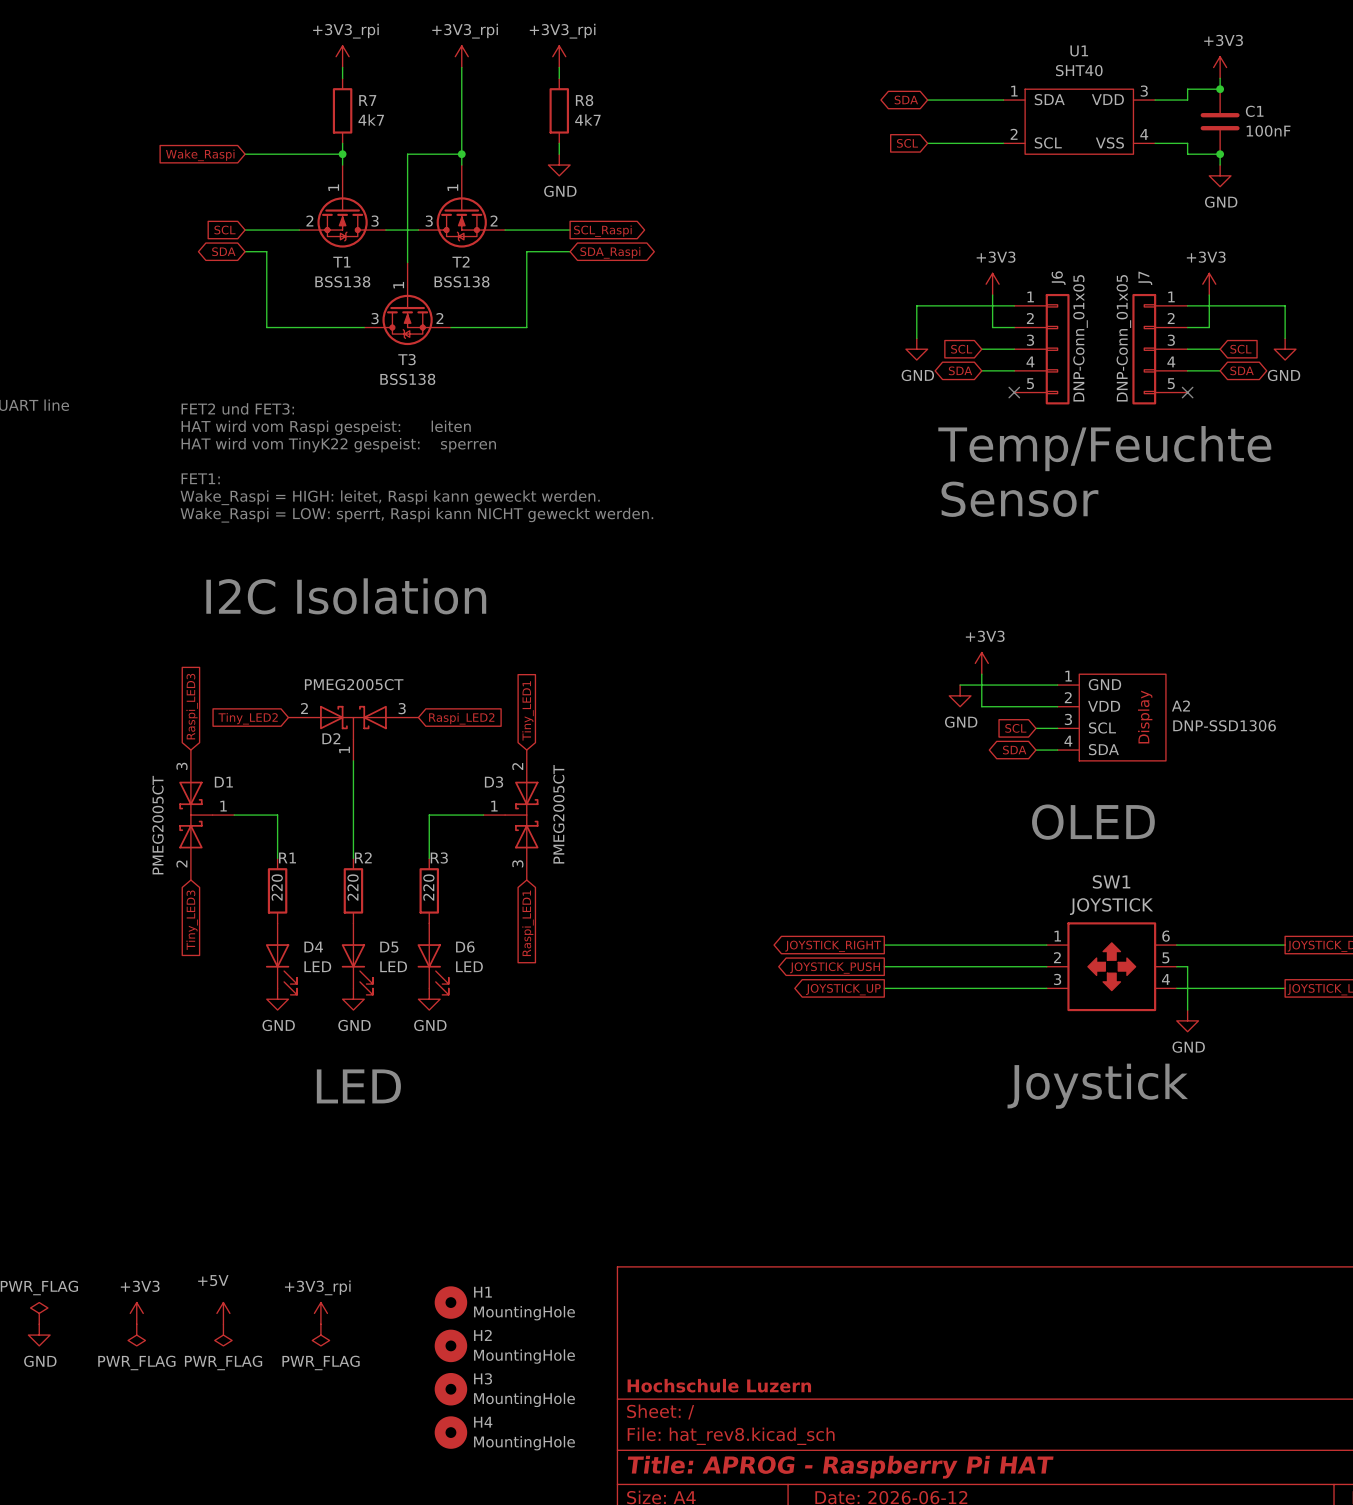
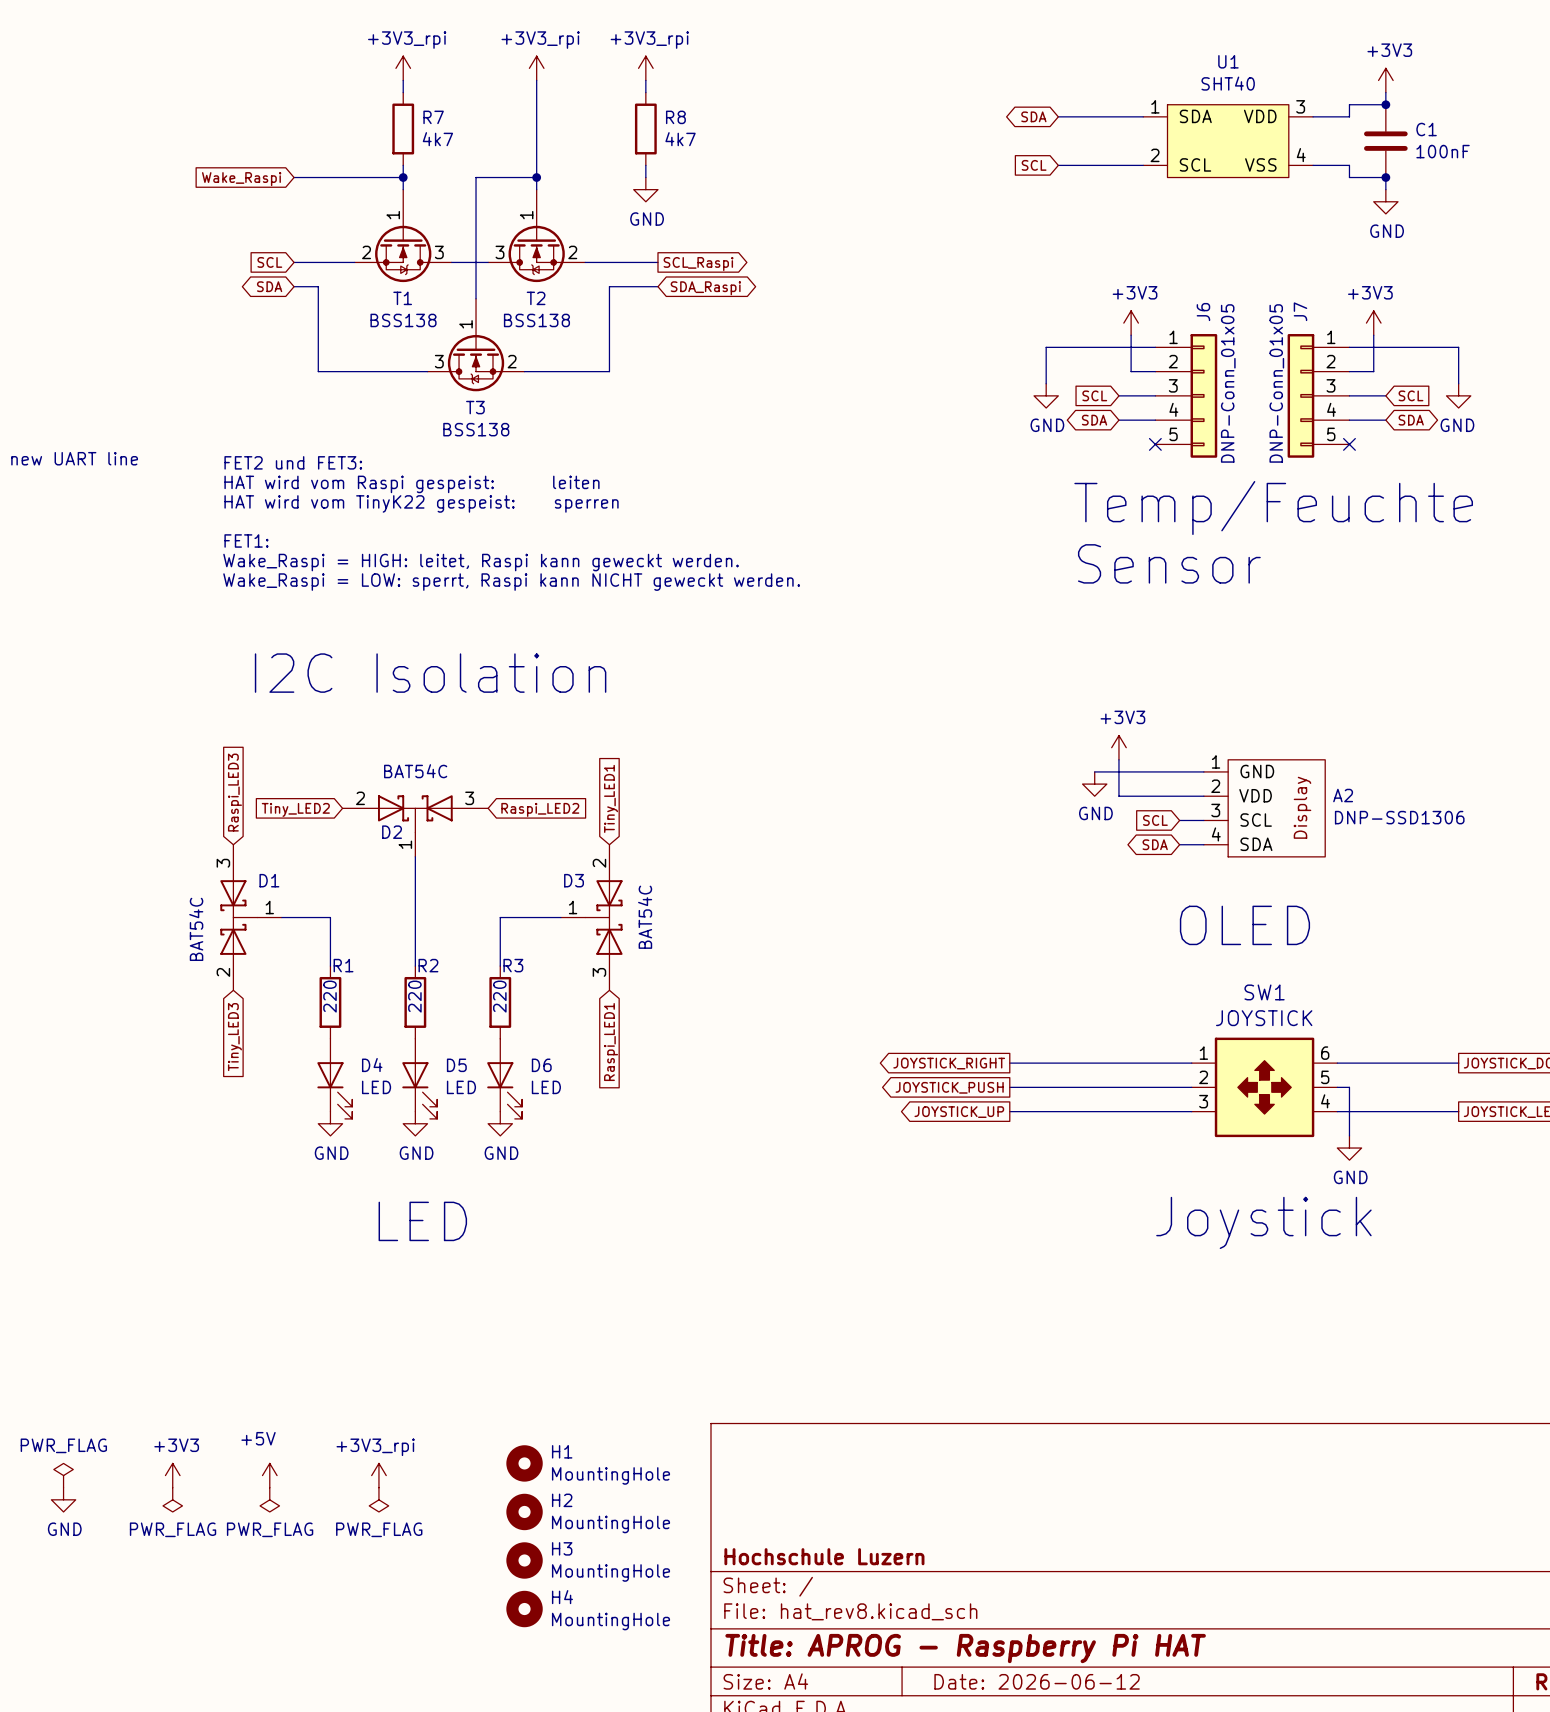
D2 value: PMEG2005CT (354, 684) -> BAT54C (415, 771)
D3 value: PMEG2005CT (558, 814) -> BAT54C (645, 917)
D1 value: PMEG2005CT (158, 825) -> BAT54C (196, 929)

